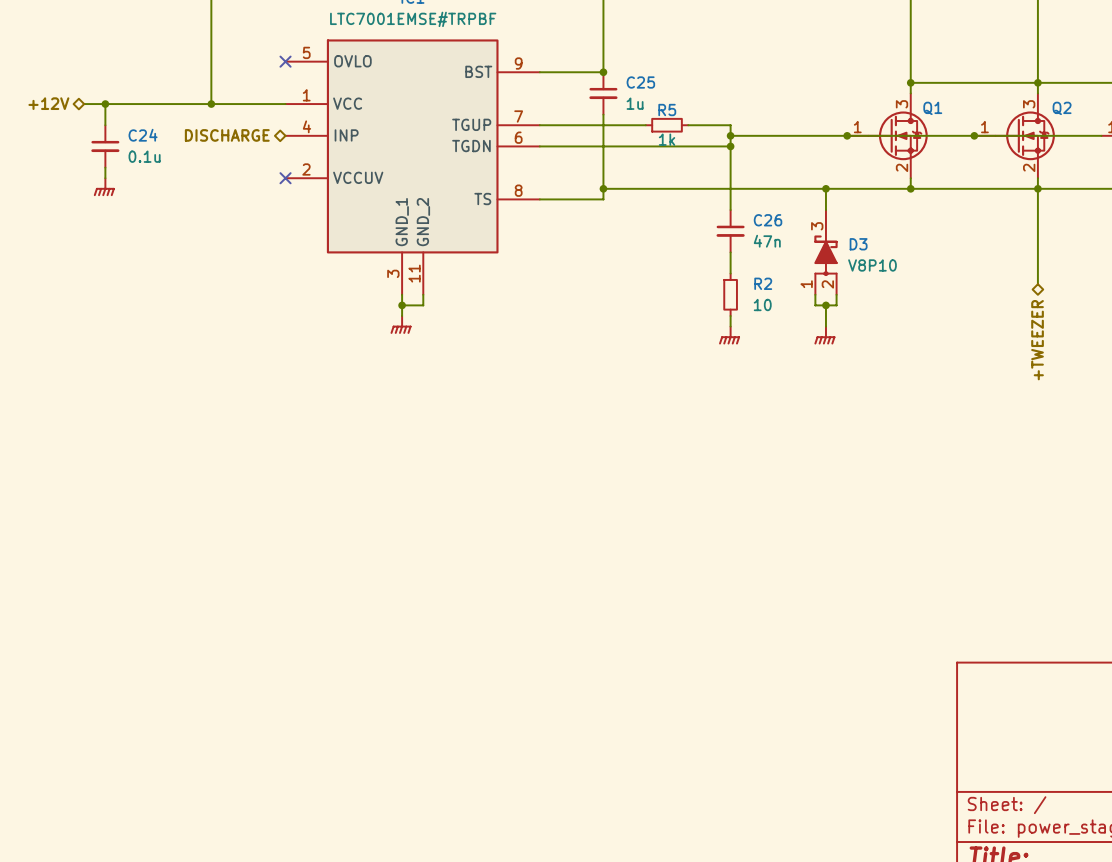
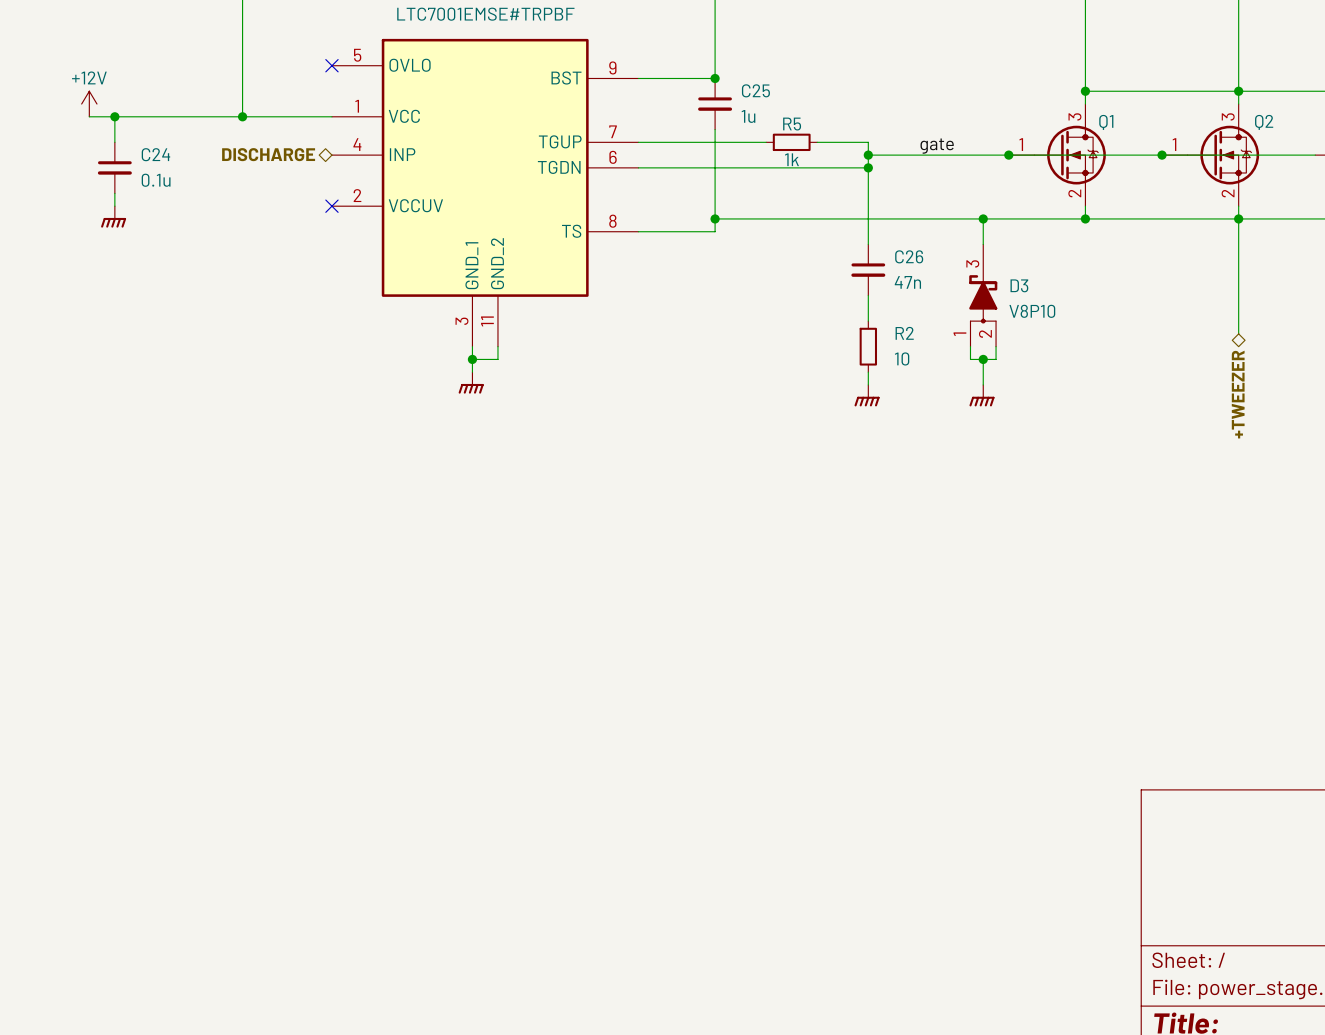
power symbol: none -> +12V (89, 104)
hierarchical label: +12V (48, 103) -> none
label: none -> gate (937, 146)

